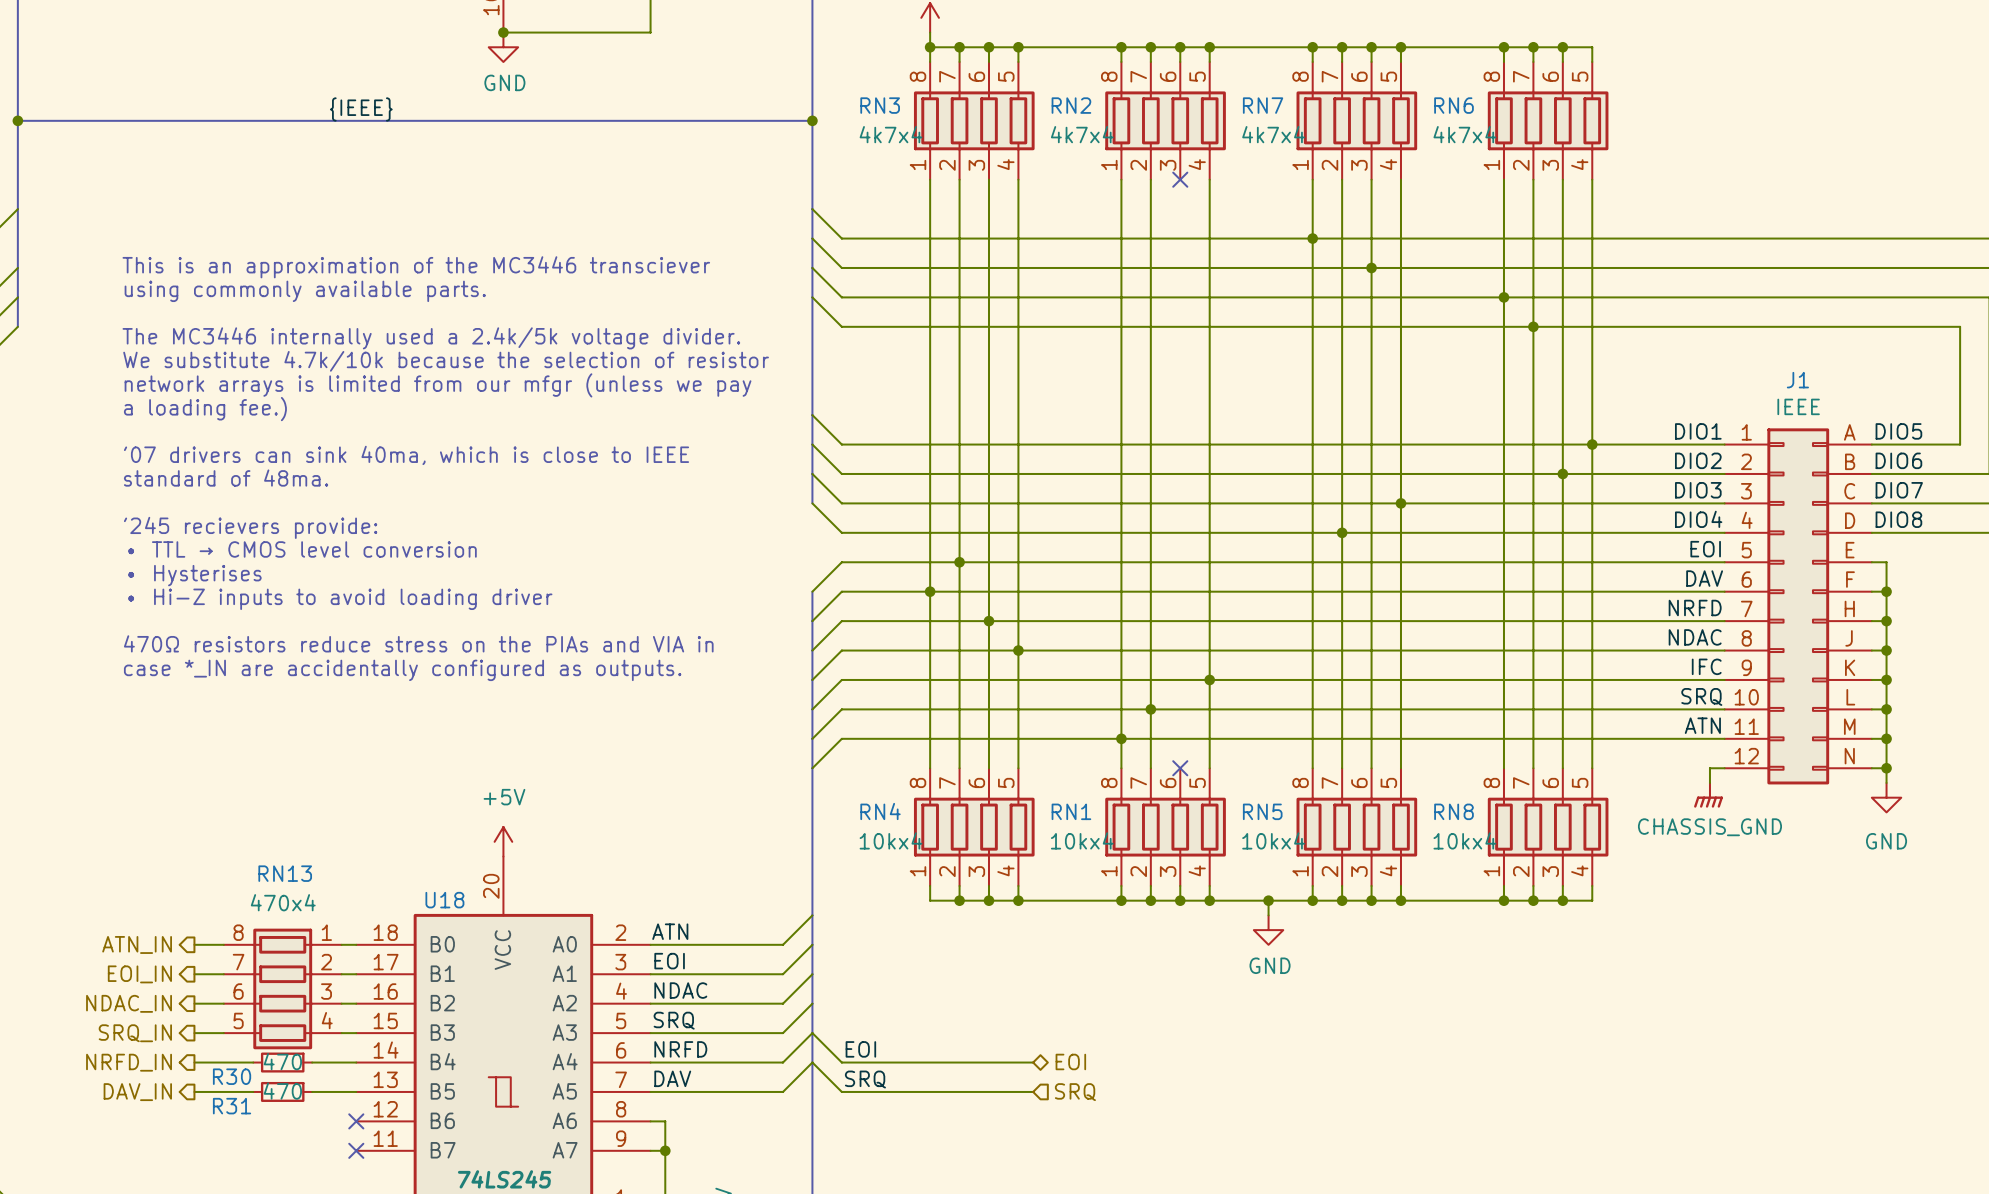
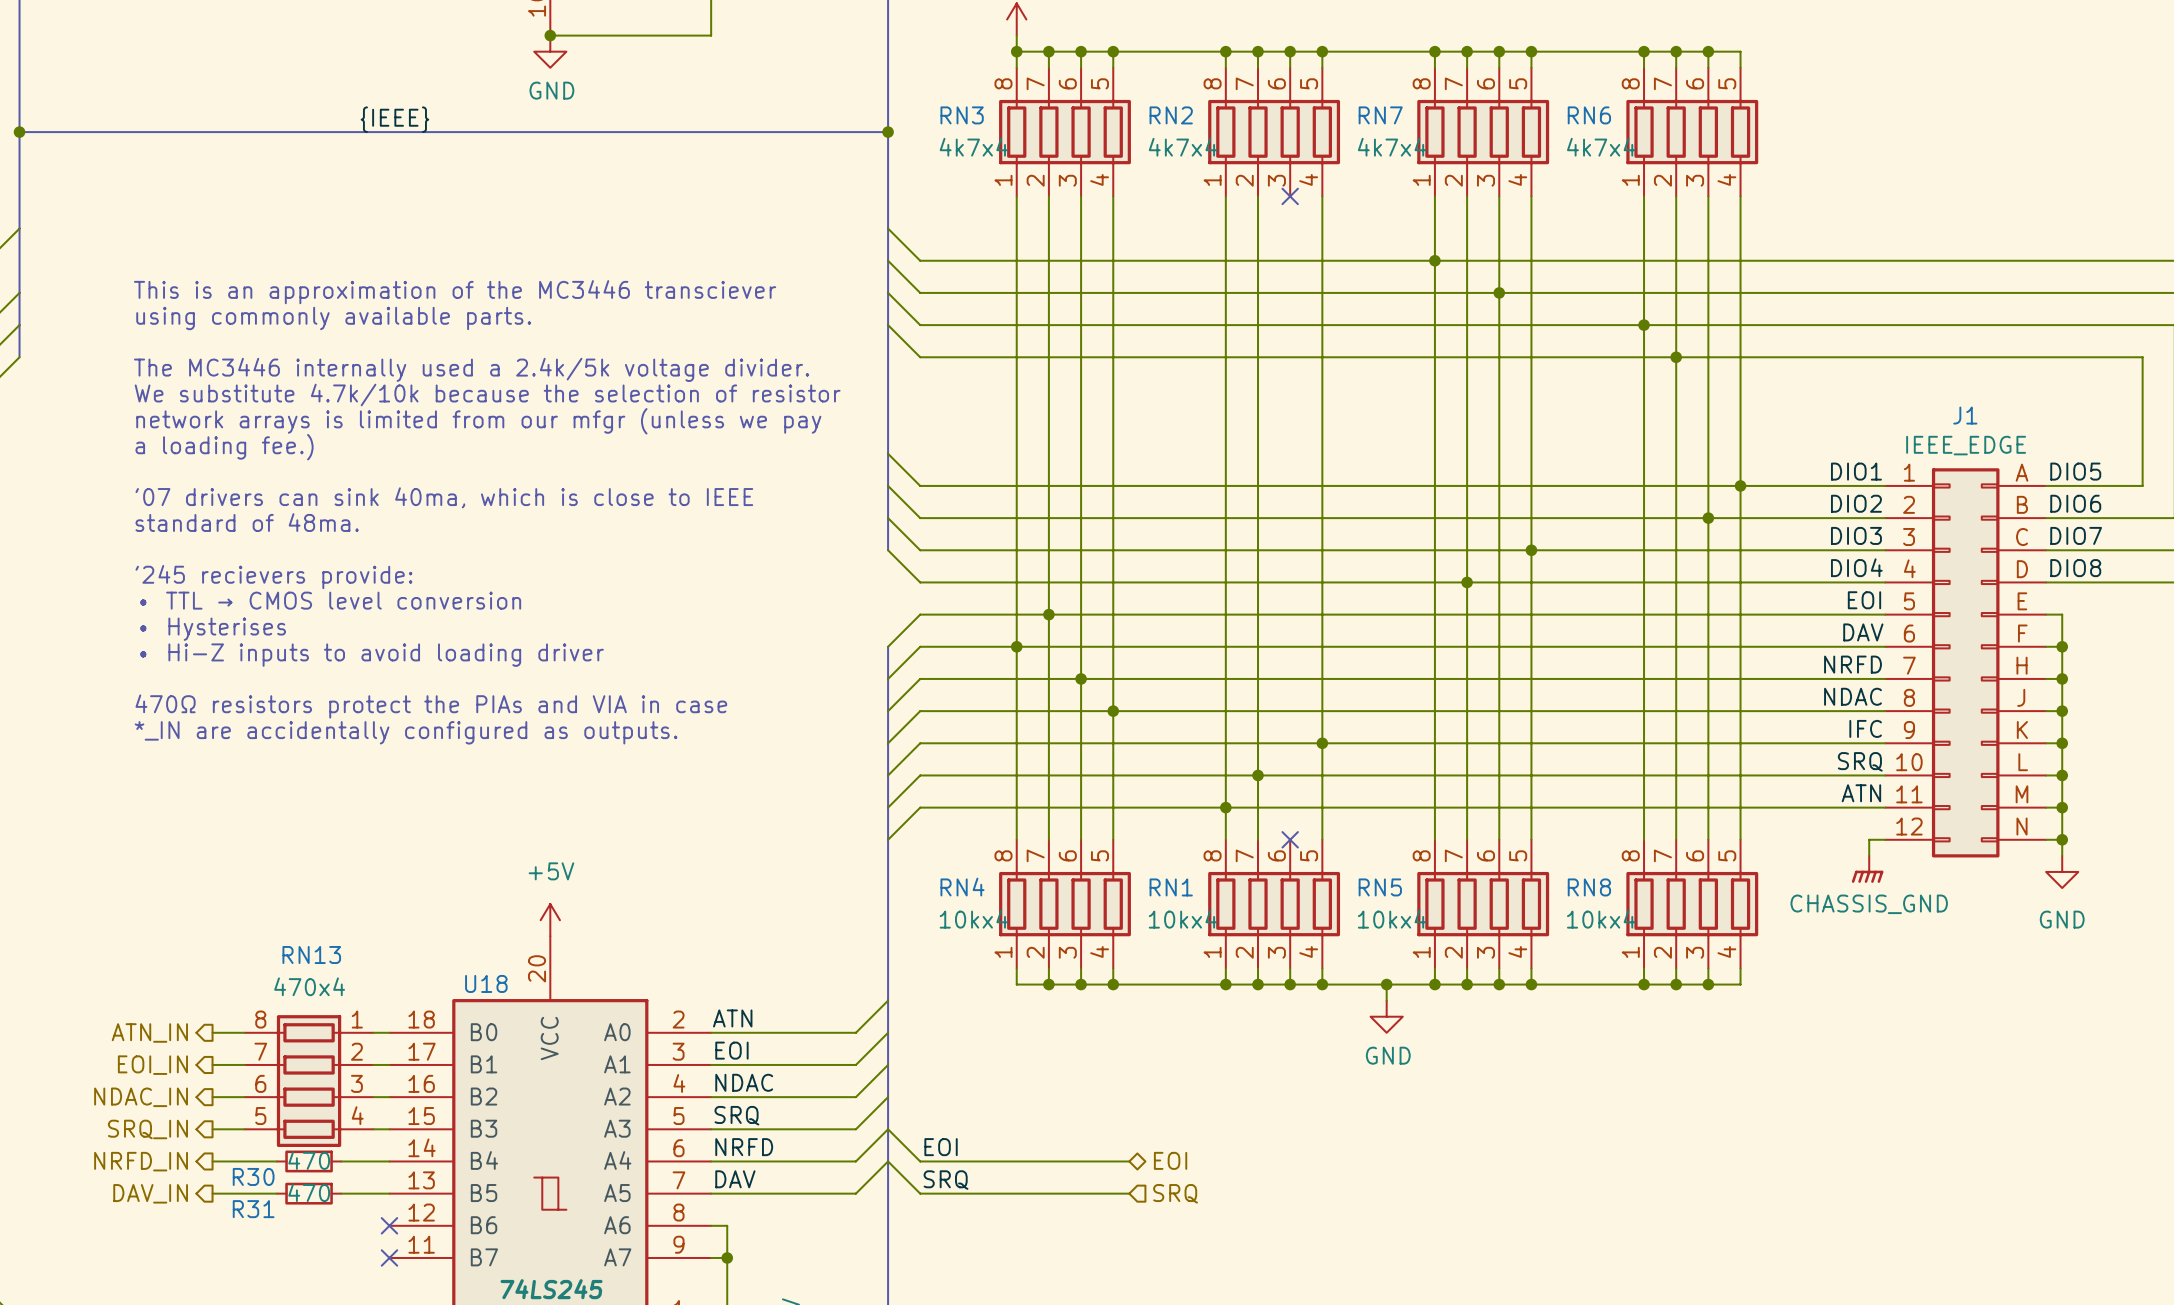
J1 value: IEEE (1798, 406) -> IEEE_EDGE (1966, 445)
text: 470Ω resistors reduce stress on the PIAs and VIA in (418, 643) -> 470Ω resistors protect the PIAs and VIA in case (431, 706)
text: case *_IN are accidentally configured as outputs. (402, 670) -> *_IN are accidentally configured as outputs. (406, 732)

